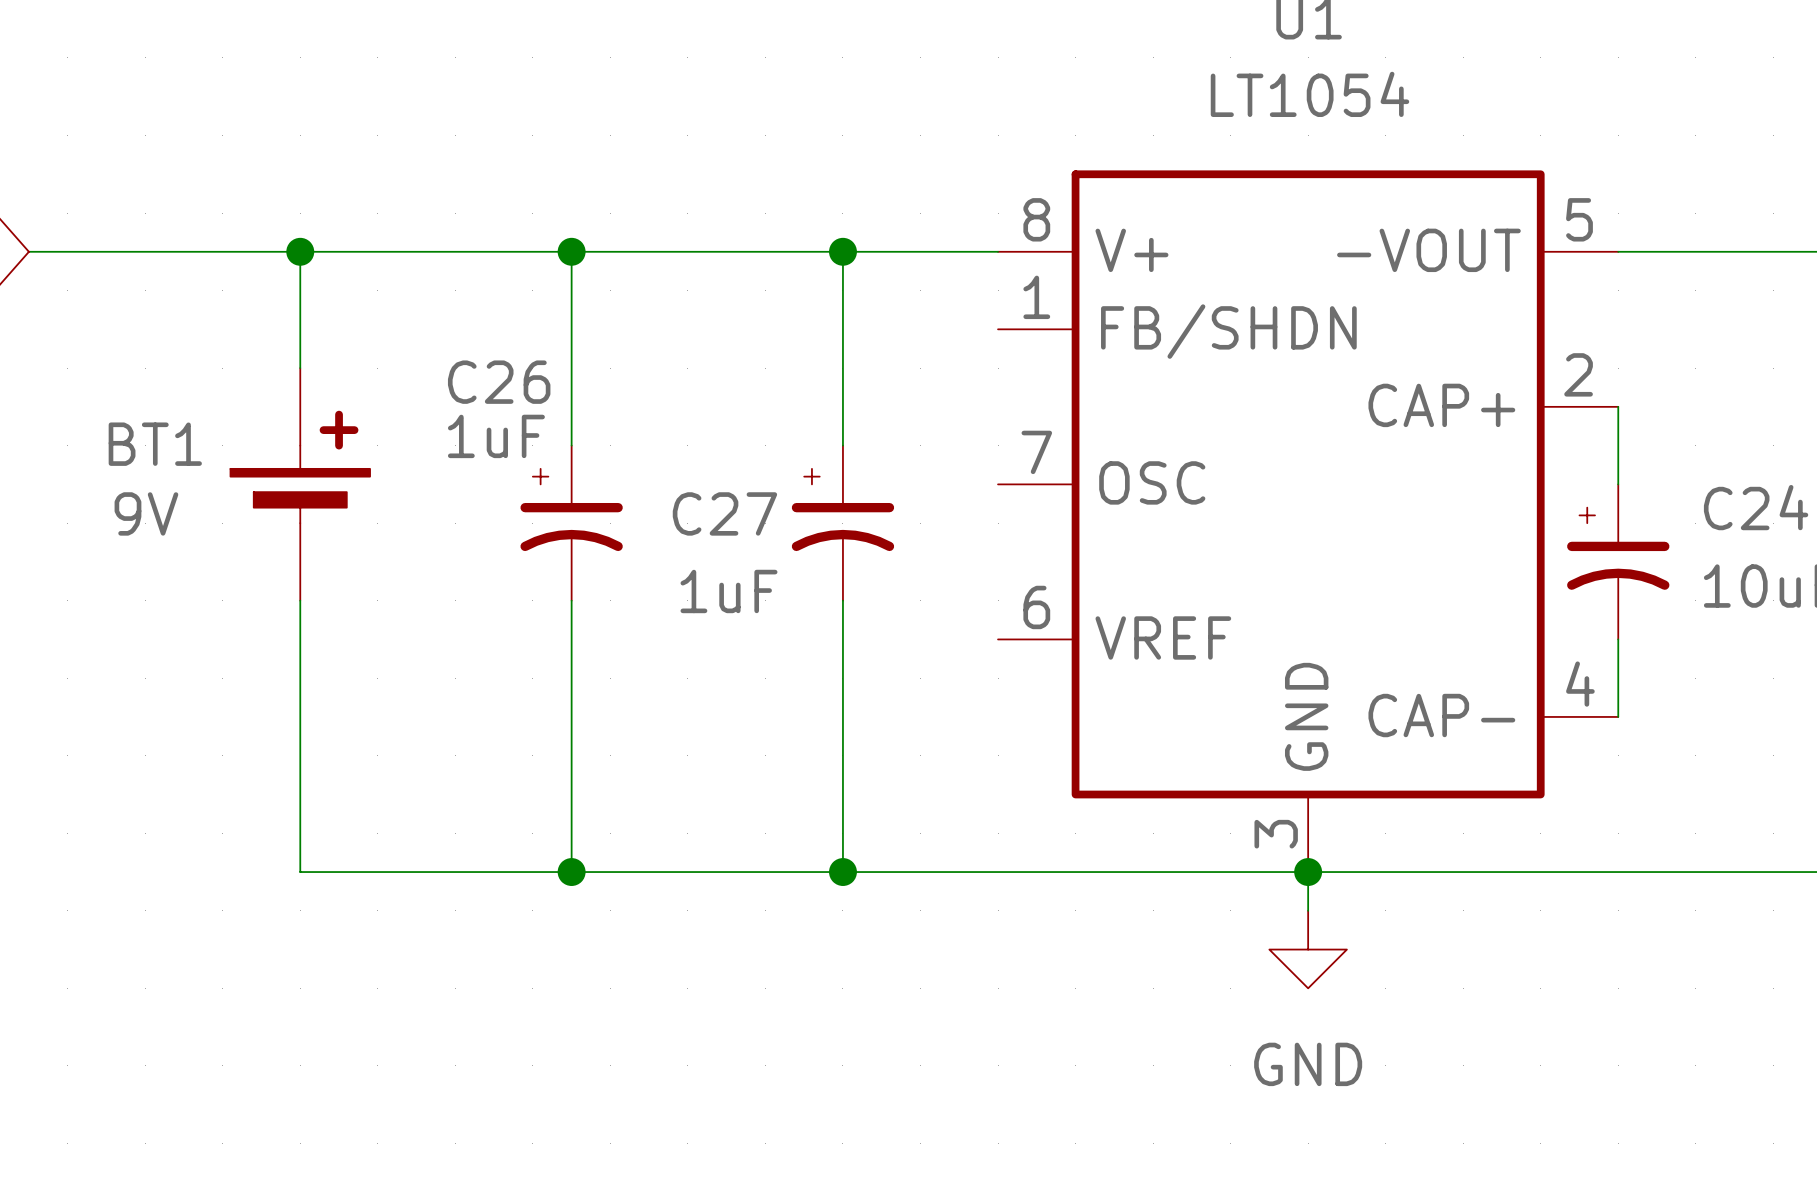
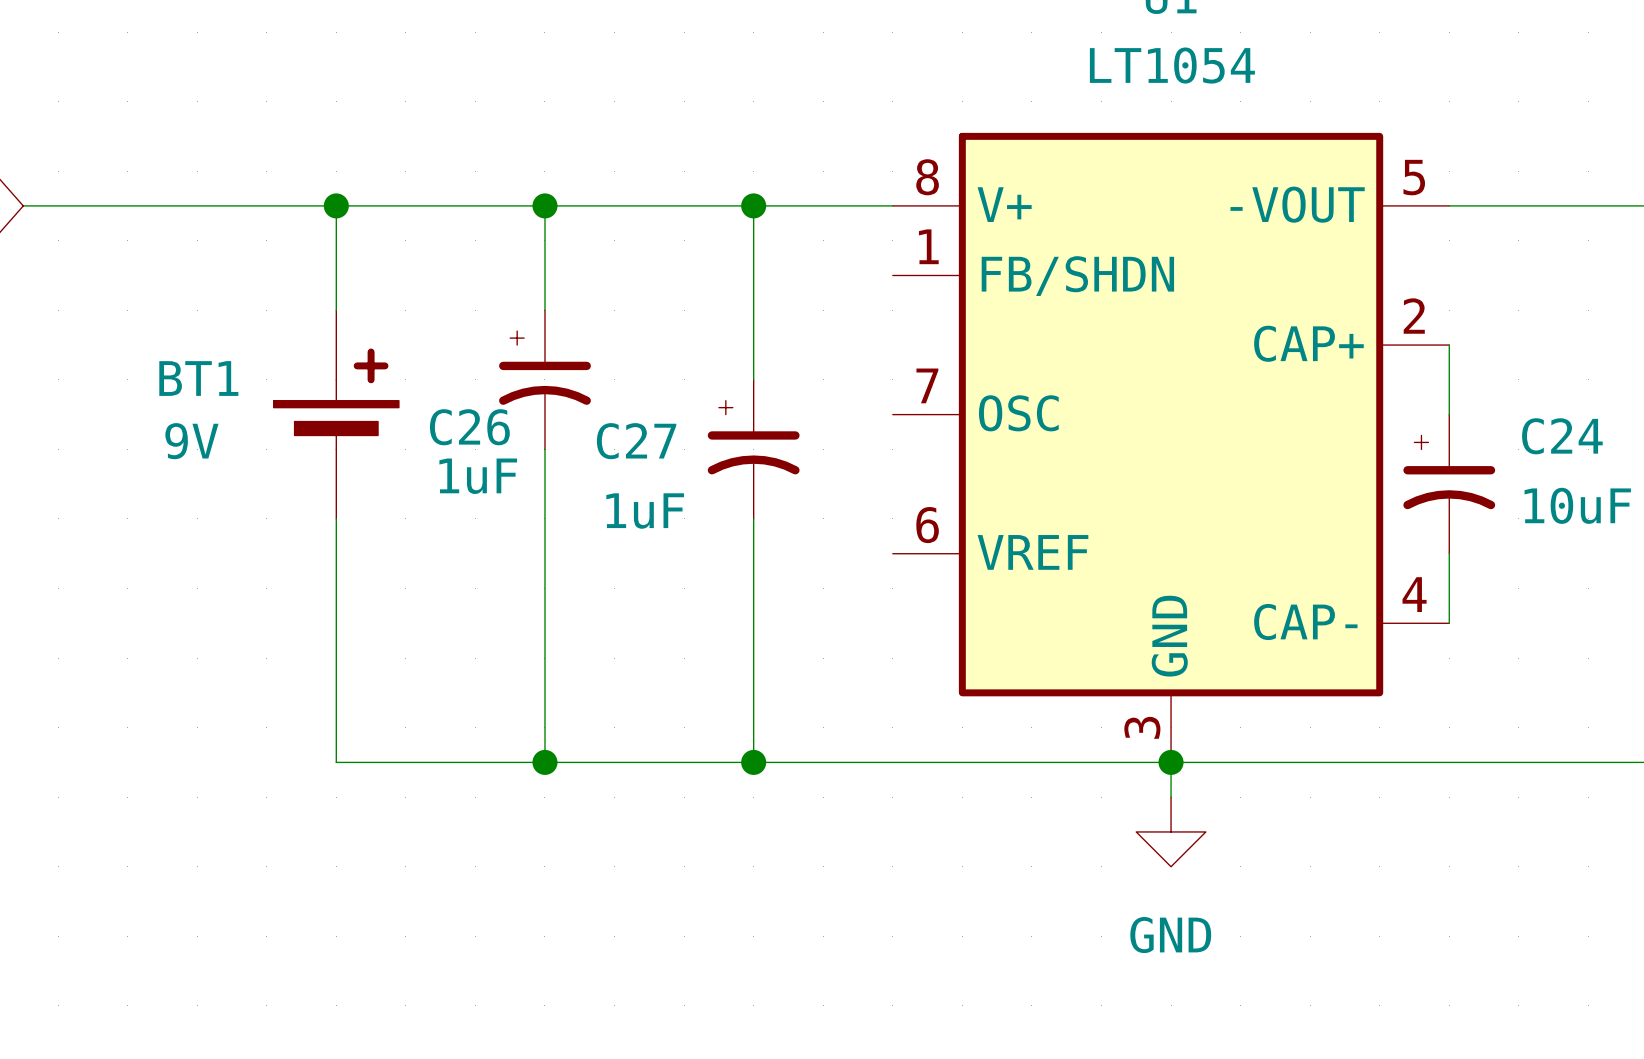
wire: (300, 251) (300, 368) -> (336, 205) (336, 310)
junction position: (300, 251) -> (336, 205)
wire: (571, 251) (571, 445) -> none
junction position: (571, 251) -> (544, 205)
wire: none -> (544, 205) (544, 310)
C26 name position: C26 (499, 382) -> C26 (469, 427)
C26 value position: 1uF (496, 436) -> 1uF (478, 476)
BT1 position: (300, 484) -> (336, 414)
C26 position: (571, 523) -> (544, 379)
wire: none -> (544, 449) (544, 762)
wire: (300, 600) (300, 872) (377, 872) -> (336, 518) (336, 762)
wire: (571, 600) (571, 872) -> none
junction position: (571, 872) -> (544, 762)

